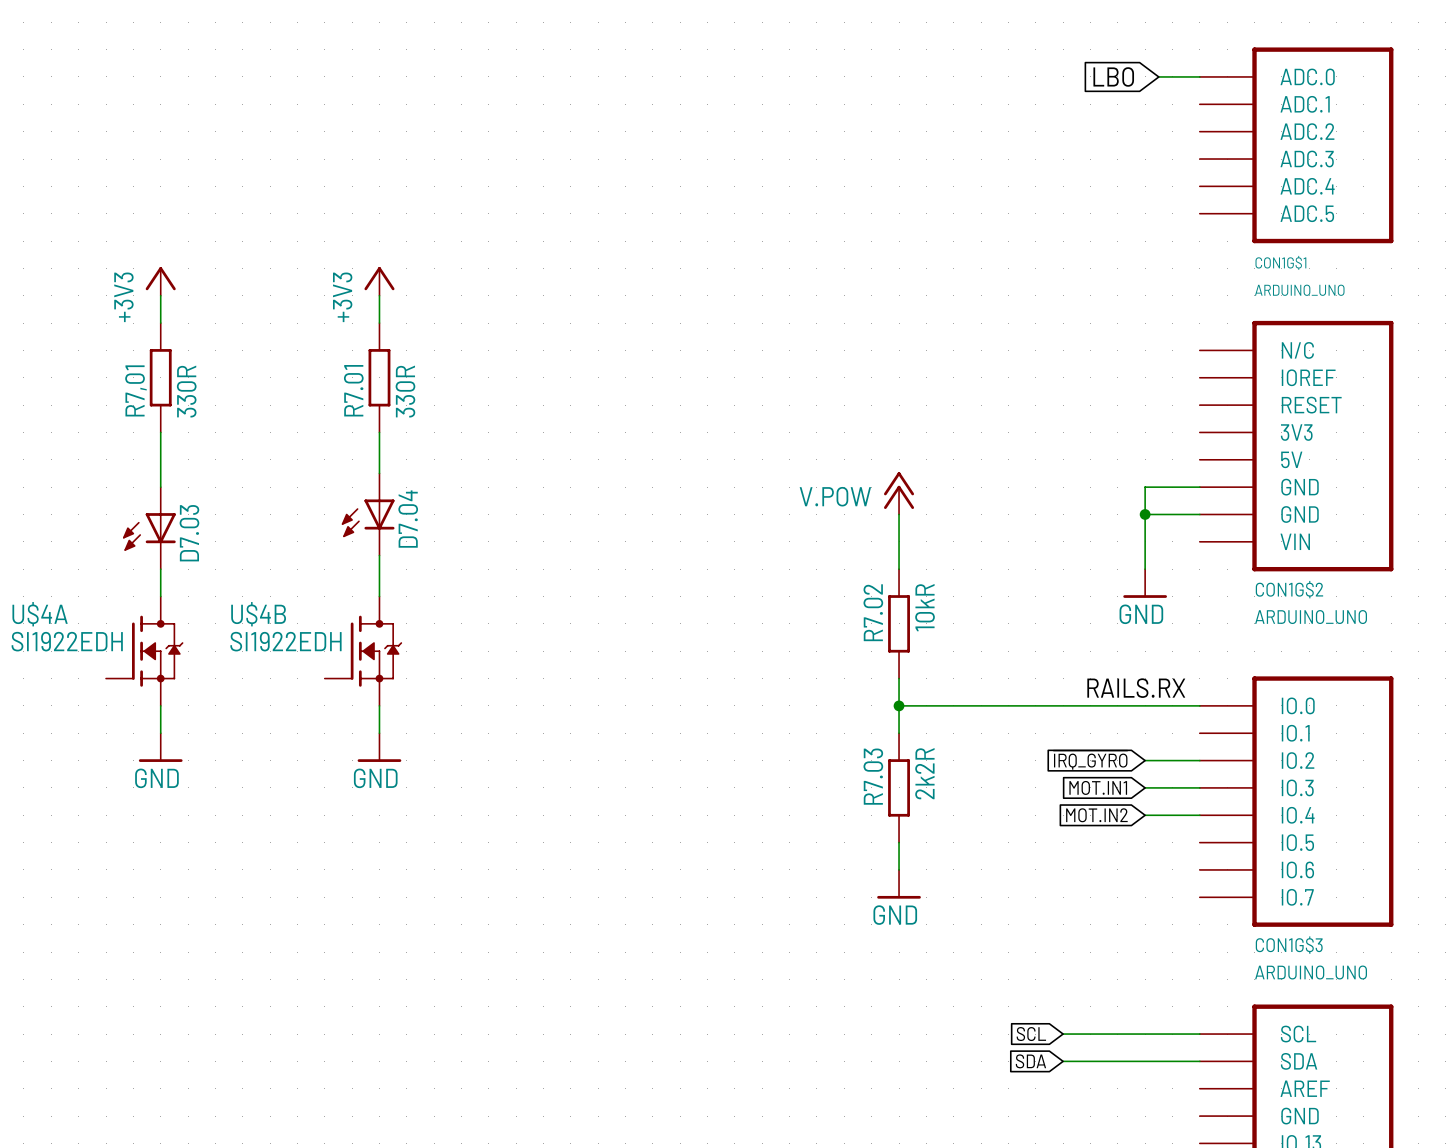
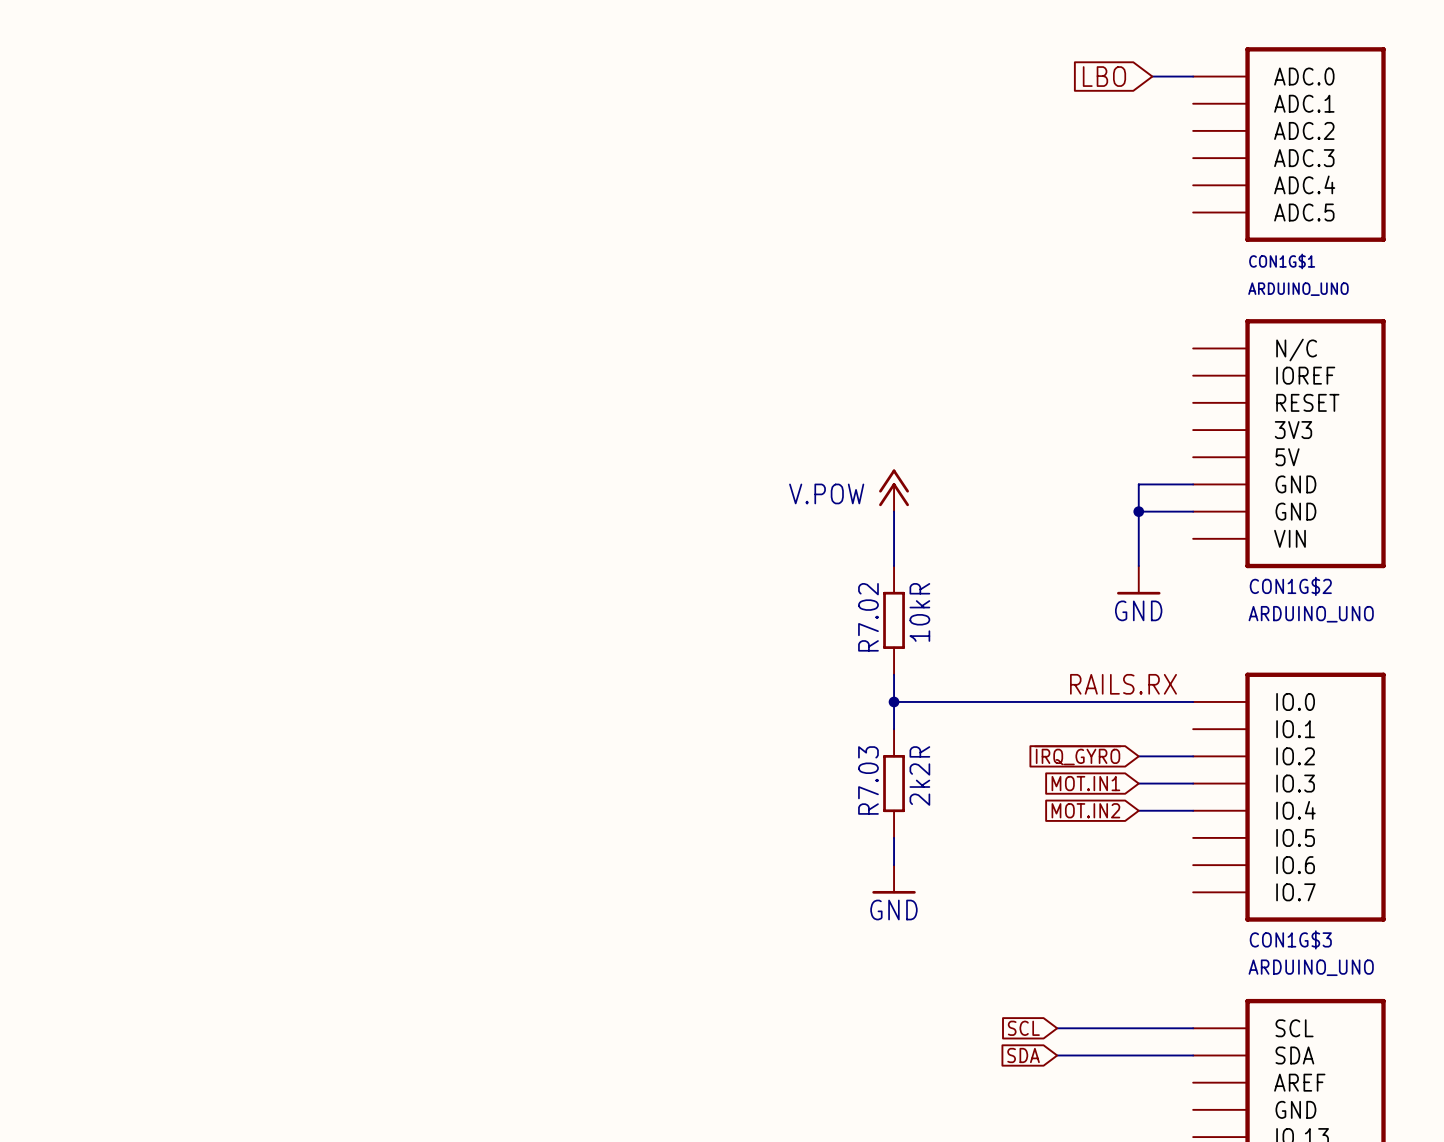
power symbol: +3V3 (160, 281) -> none
power symbol: +3V3 (379, 281) -> none
wire: (160, 295) (160, 323) -> none
wire: (379, 295) (379, 323) -> none
R7,01: 330R (160, 377) -> none
R7.01: 330R (379, 377) -> none
wire: (160, 432) (160, 487) -> none
wire: (379, 432) (379, 473) -> none
D7.04: (368, 514) -> none
D7.03: (149, 528) -> none
wire: (379, 555) (379, 596) -> none
wire: (160, 569) (160, 596) -> none
U$4A: SI1922EDH (144, 651) -> none
U$4B: SI1922EDH (363, 651) -> none
wire: (160, 705) (160, 733) -> none
wire: (379, 705) (379, 733) -> none
power symbol: GND (160, 747) -> none
power symbol: GND (379, 747) -> none

